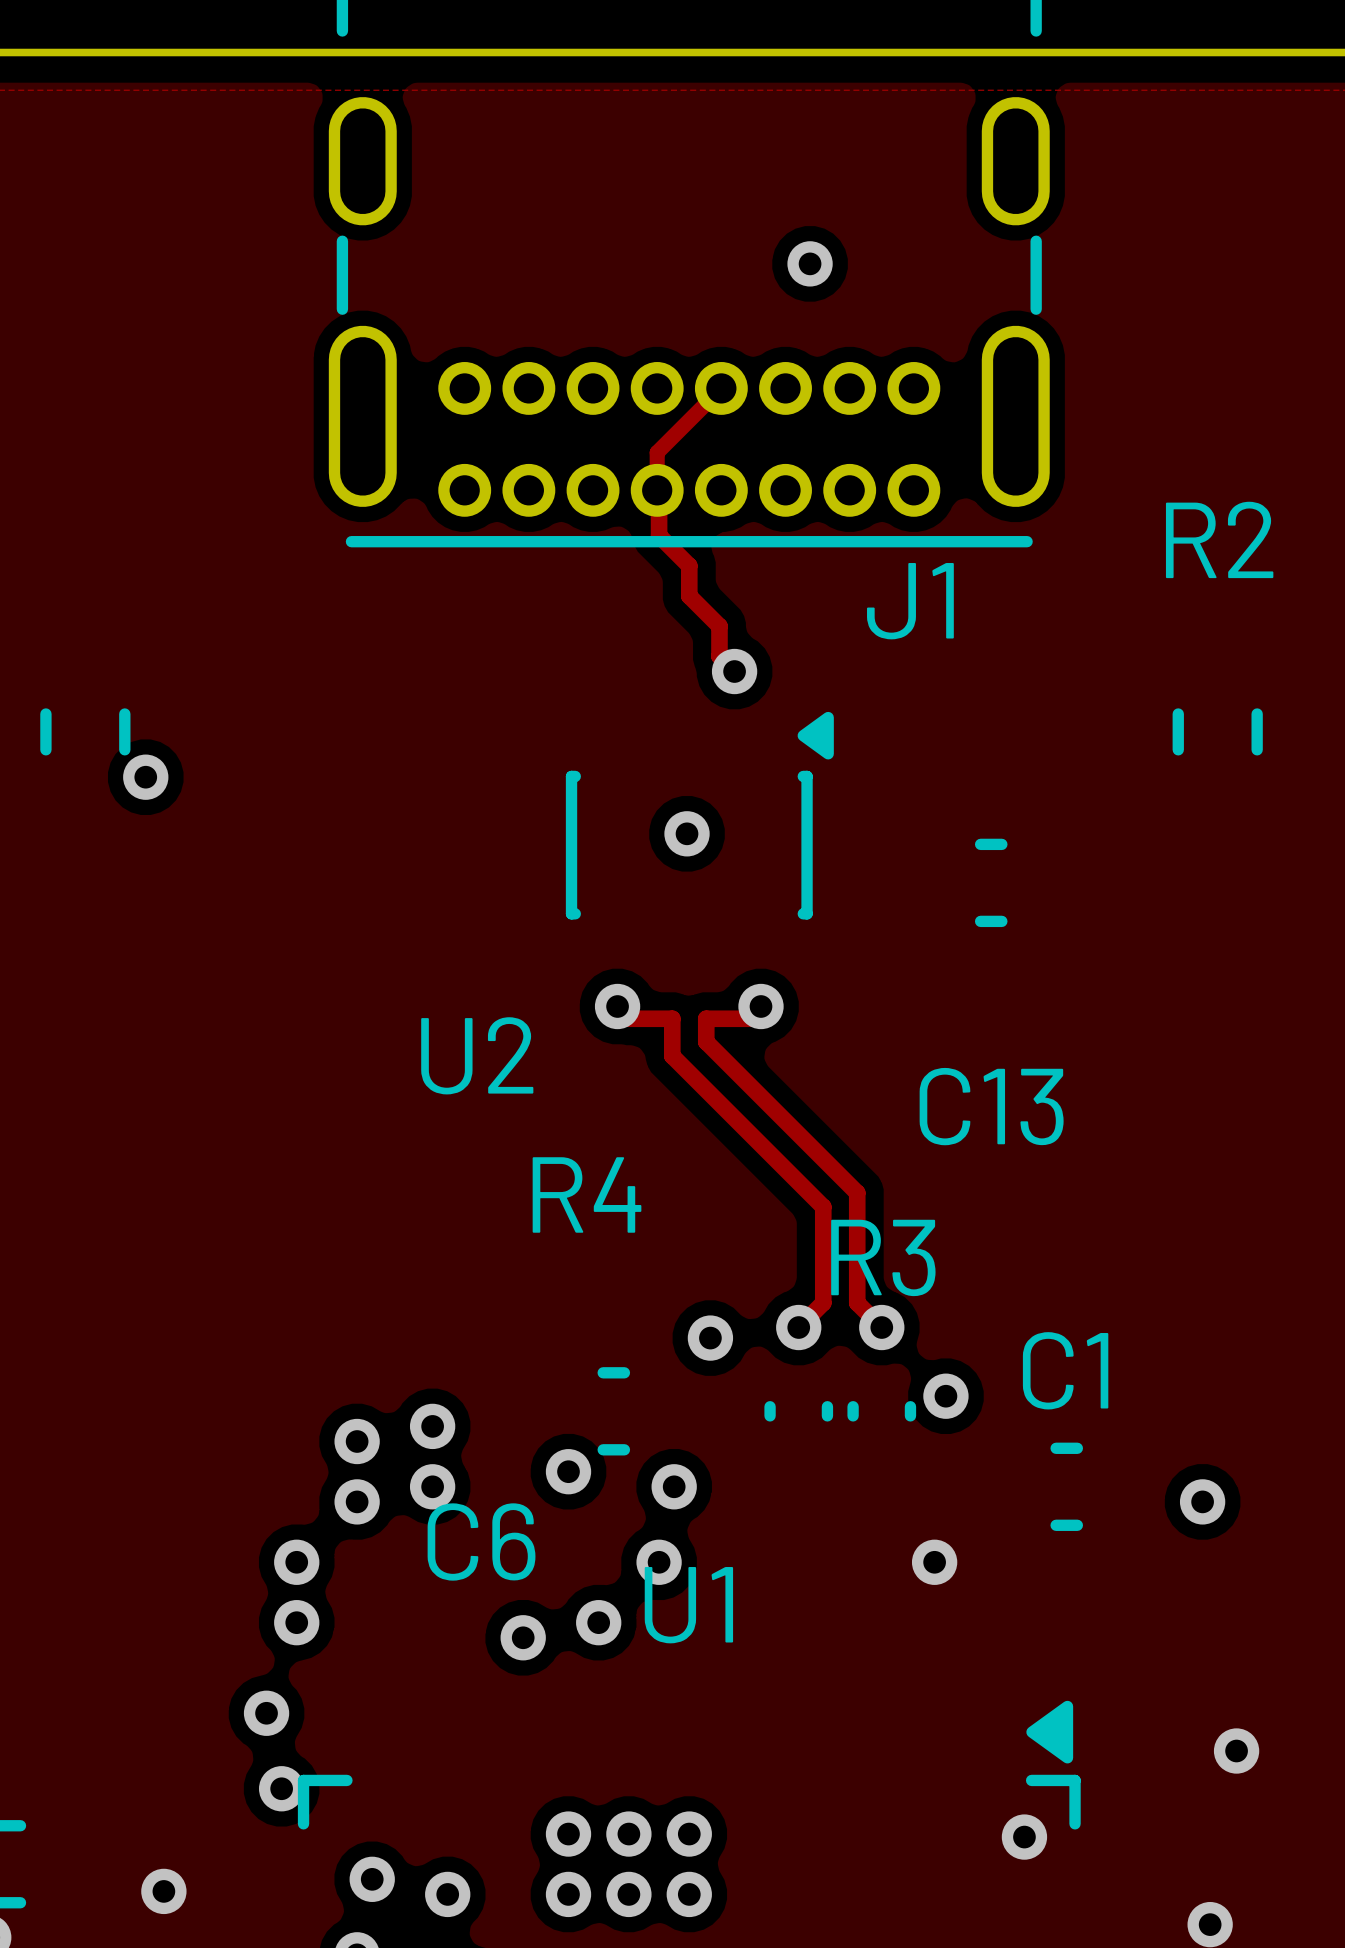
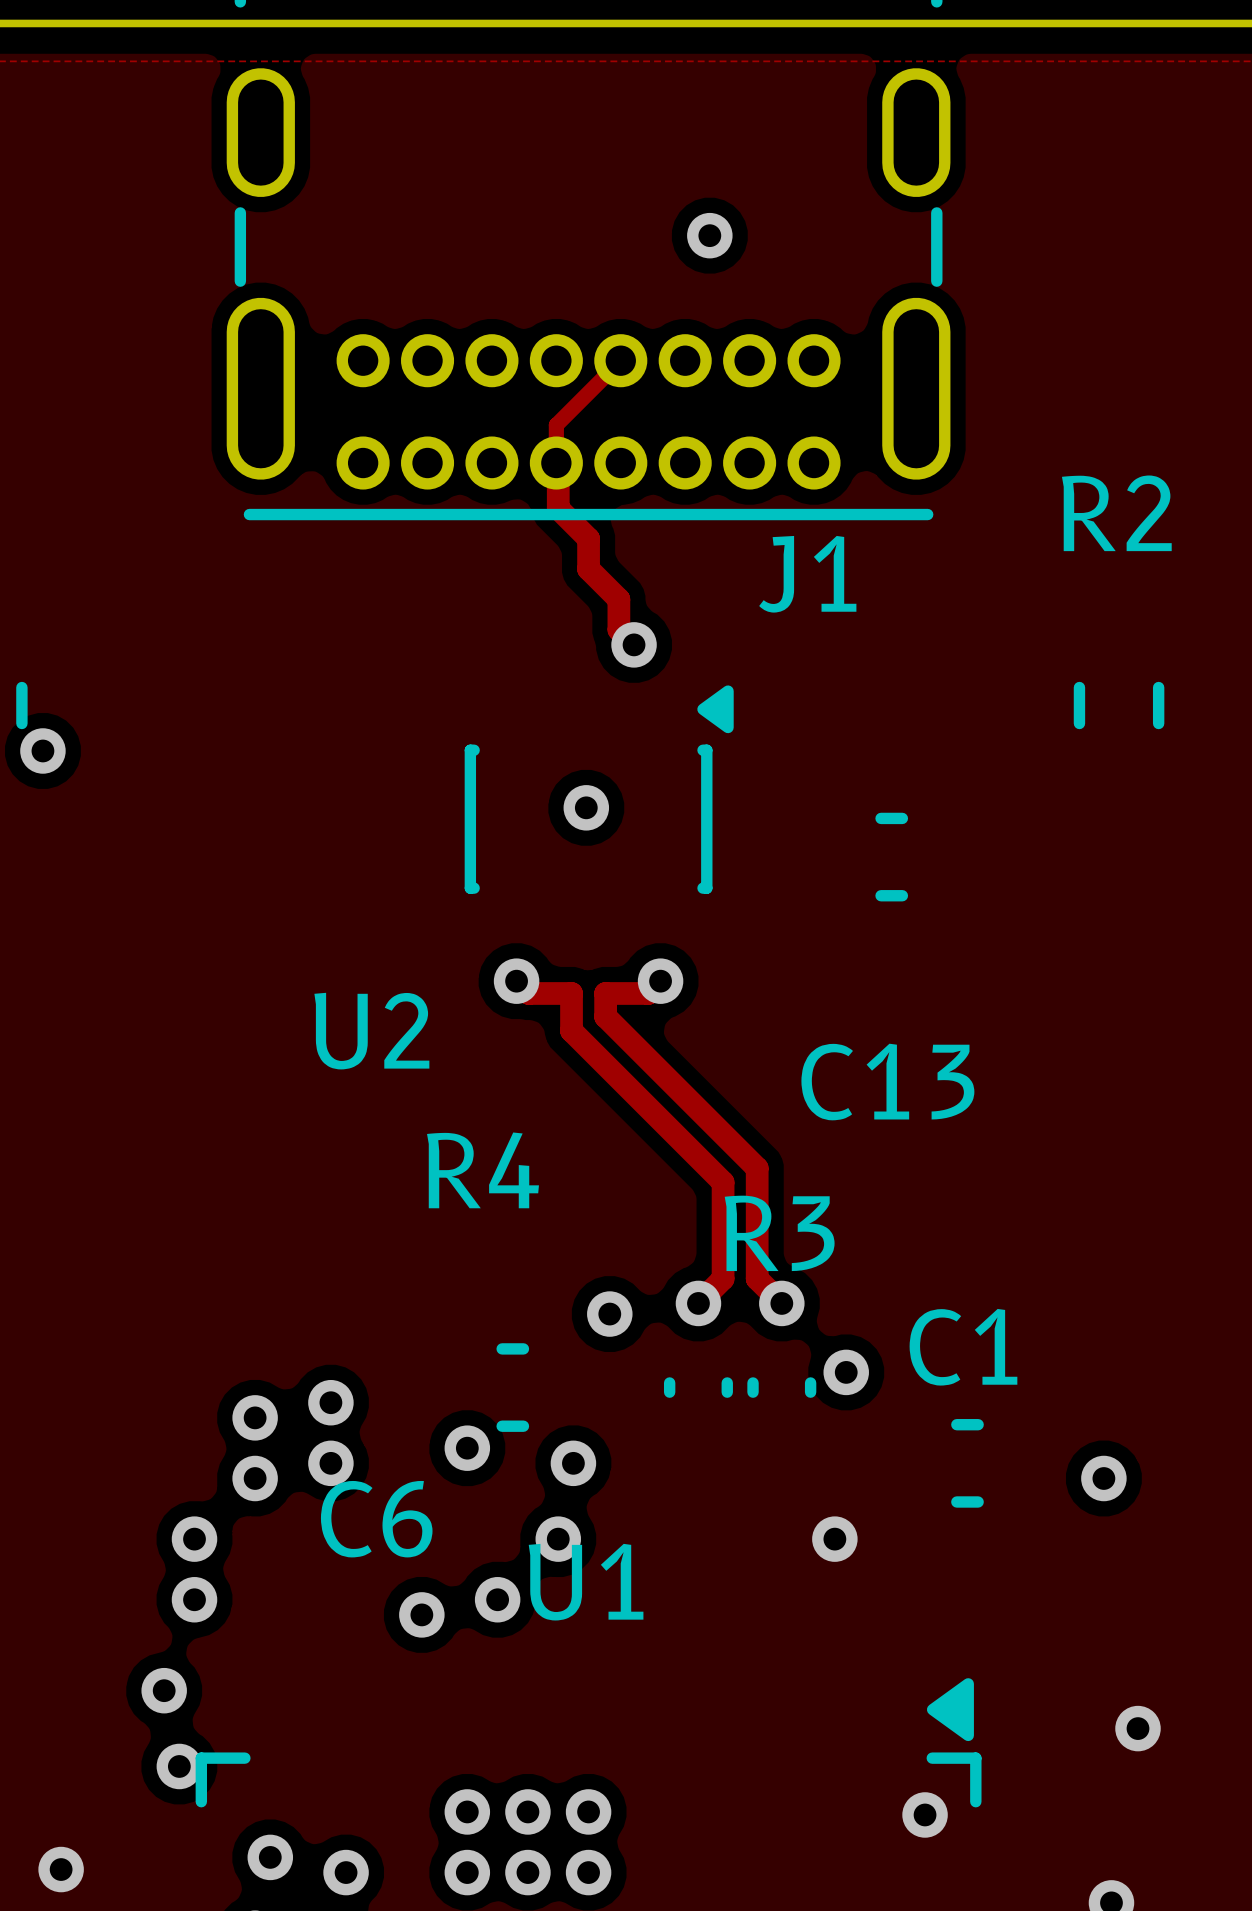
track width: thin (657, 490) (659, 492) (659, 535) (689, 565) (689, 596) (719, 626) (719, 656) (734, 671) -> thick (556, 463) (558, 464) (558, 508) (588, 538) (588, 569) (618, 599) (618, 629) (634, 644)
track width: thin (617, 1006) (629, 1018) (672, 1018) (672, 1055) (823, 1206) (823, 1302) (798, 1327) -> thick (516, 981) (528, 993) (571, 993) (571, 1030) (723, 1182) (723, 1278) (698, 1303)
track width: thin (761, 1006) (748, 1018) (706, 1018) (706, 1041) (857, 1192) (857, 1302) (881, 1327) -> thick (660, 981) (648, 993) (605, 993) (605, 1016) (757, 1168) (757, 1278) (781, 1303)

